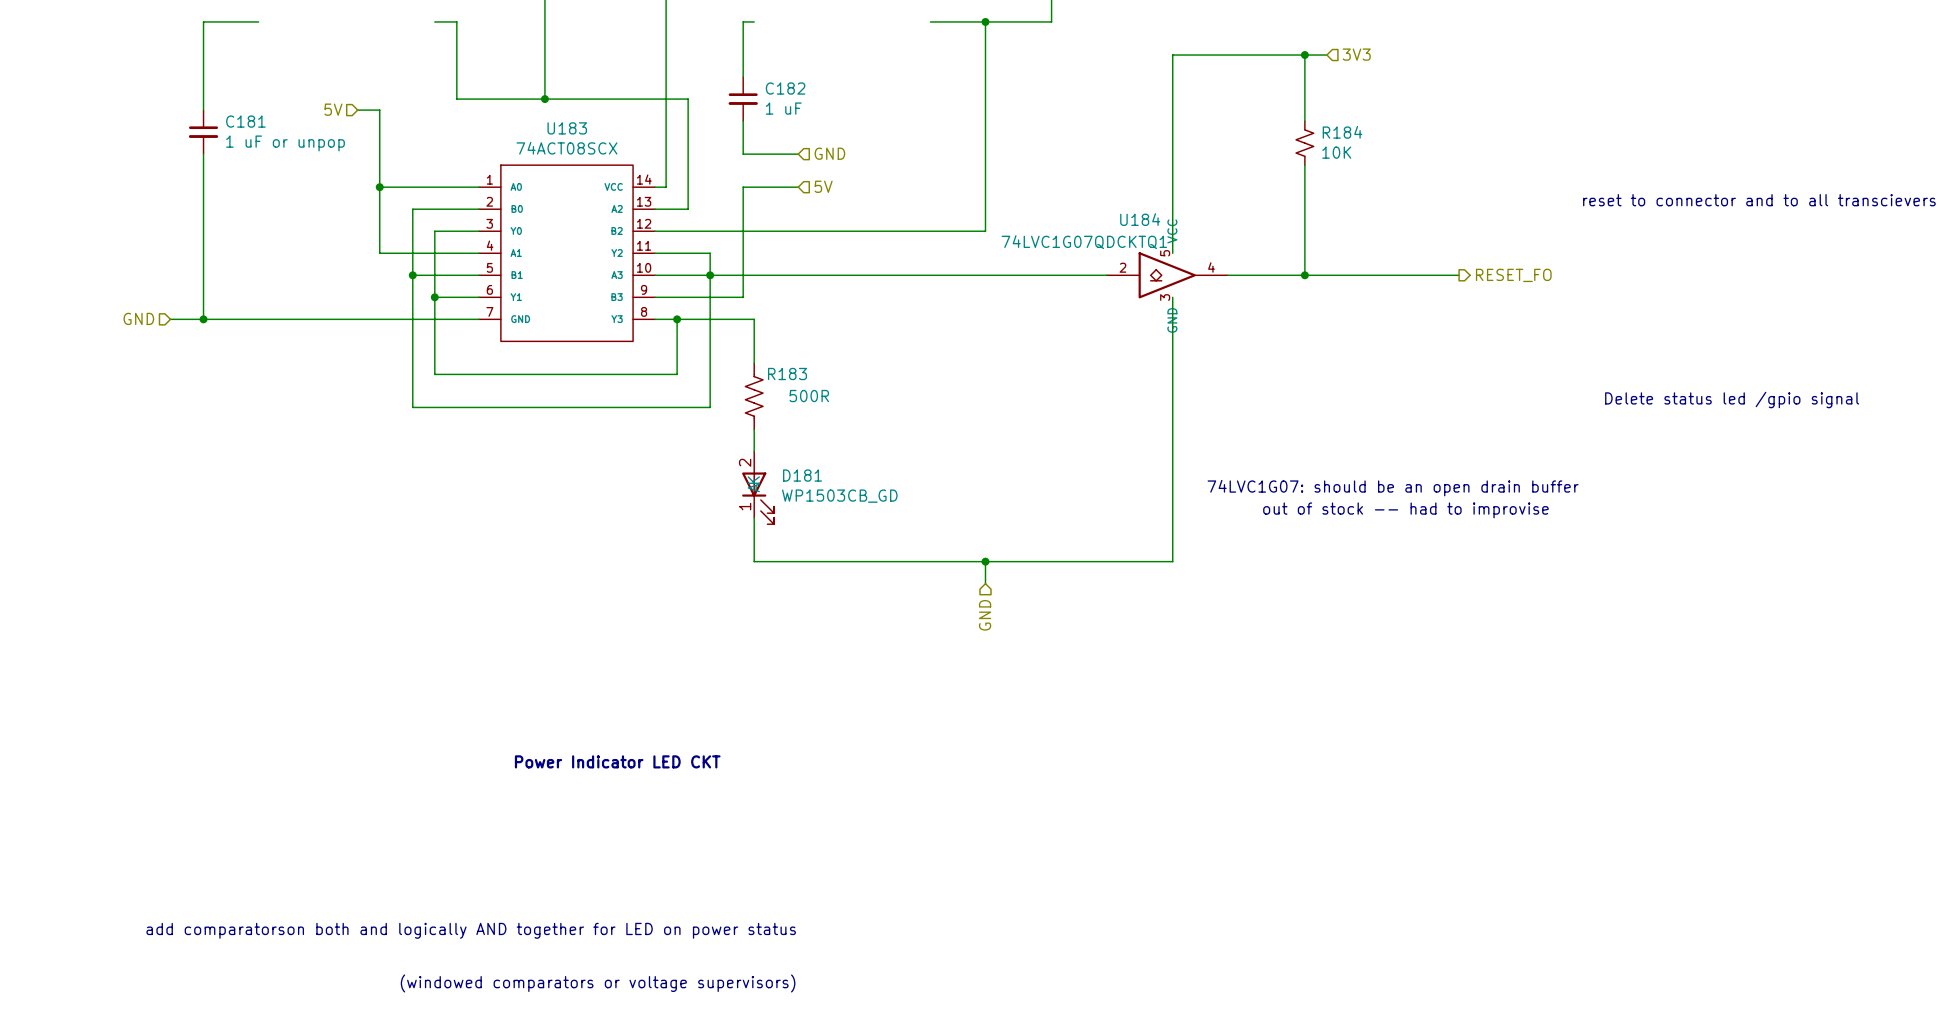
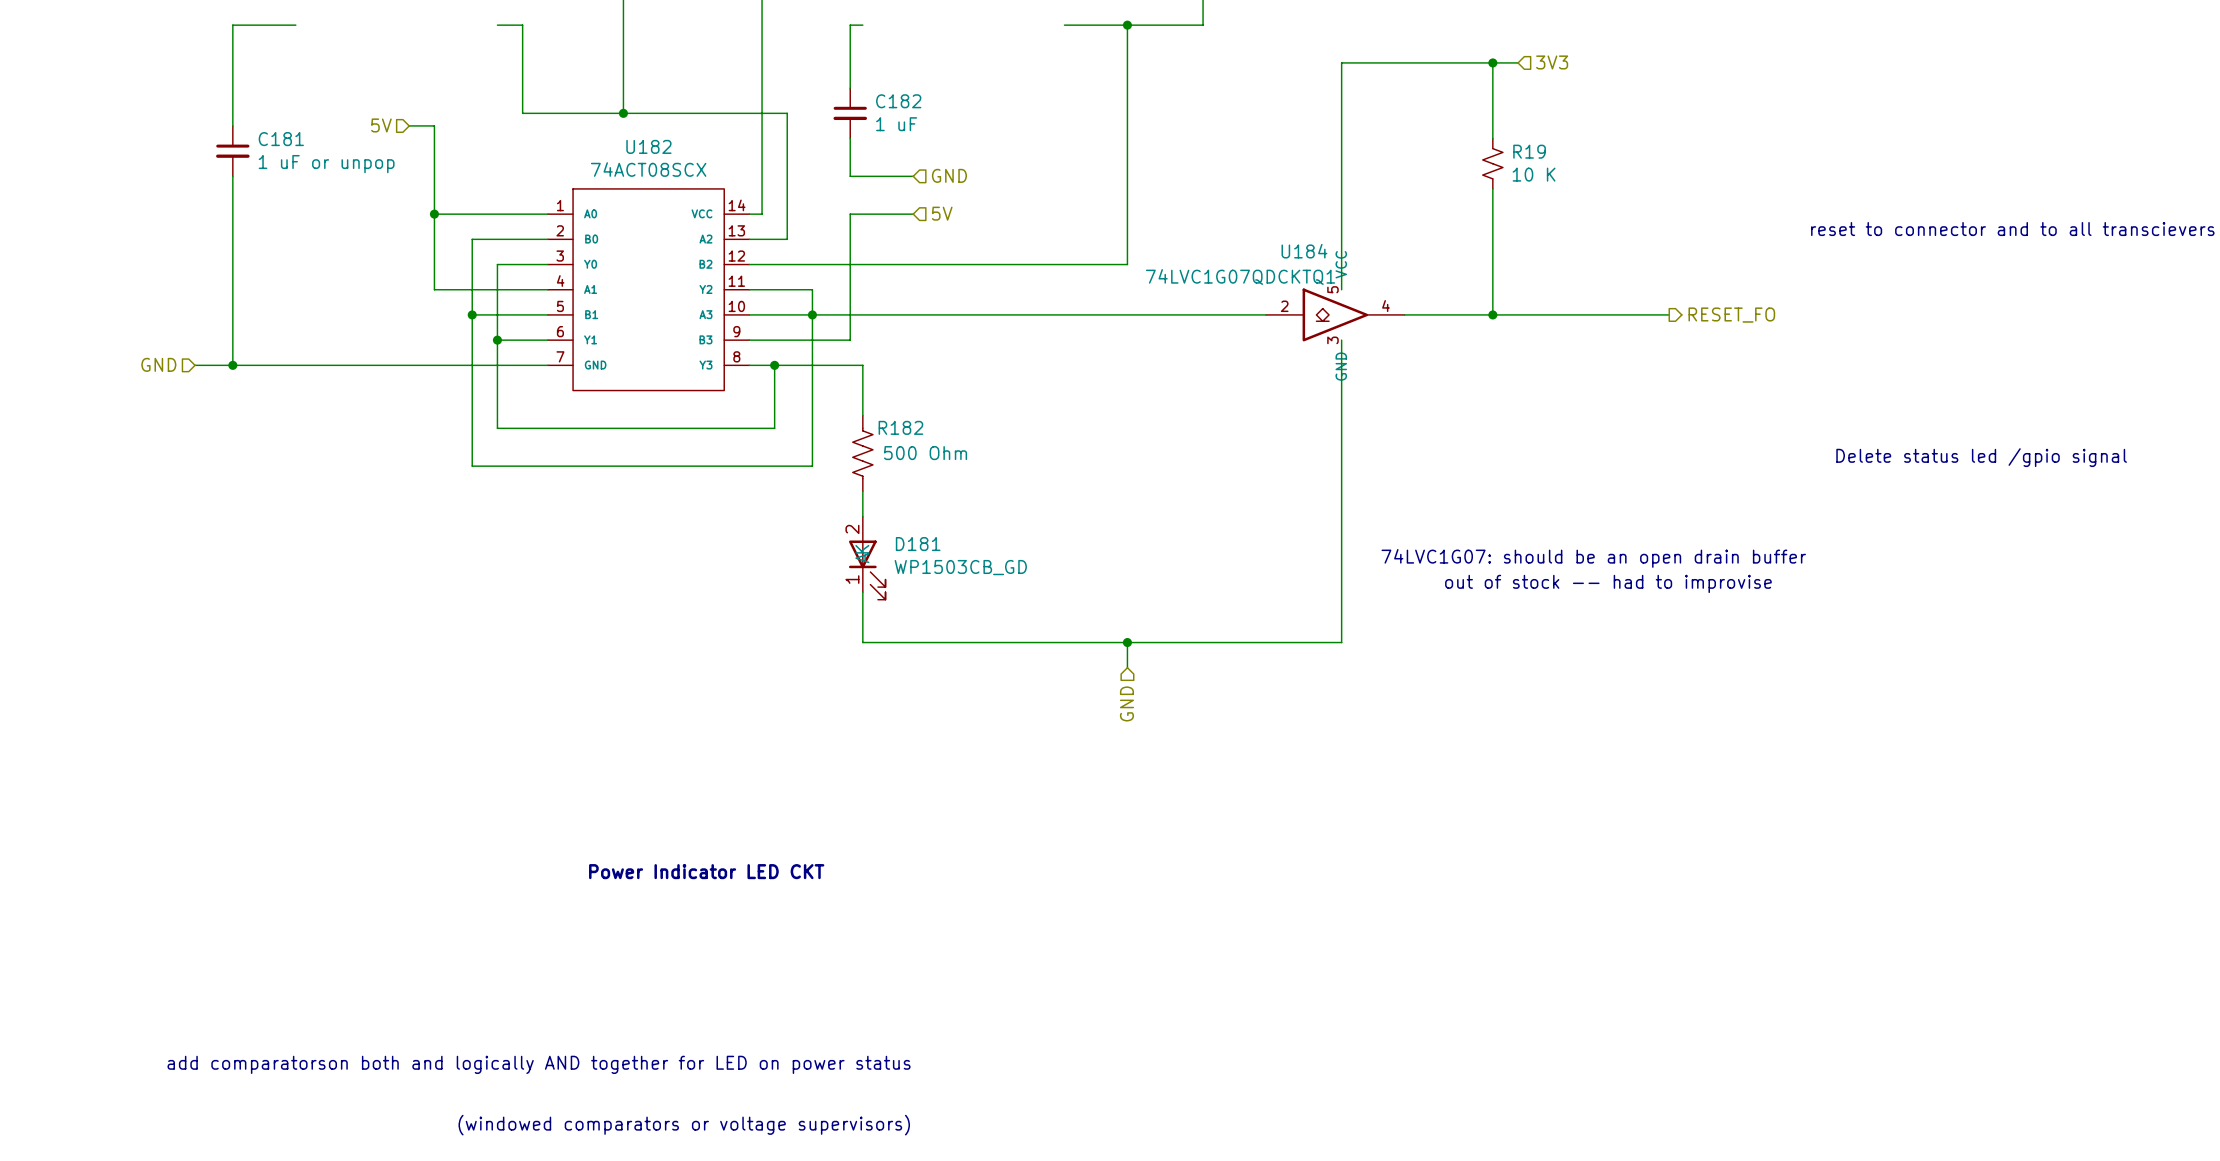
U183 name: U183 (567, 128) -> U182 (648, 146)
R184 name: R184 (1342, 132) -> R19 (1529, 151)
R184 value: 10K (1336, 152) -> 10 K (1534, 174)
R183 name: R183 (787, 374) -> R182 (900, 427)
R183 value: 500R (809, 396) -> 500 Ohm (925, 453)

